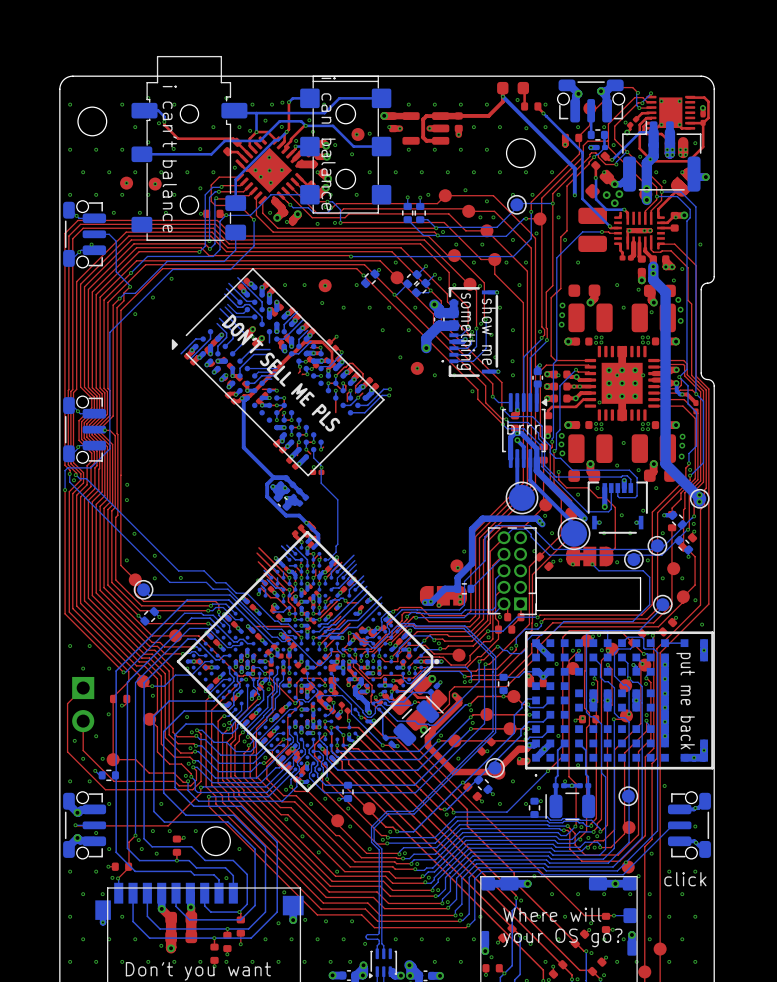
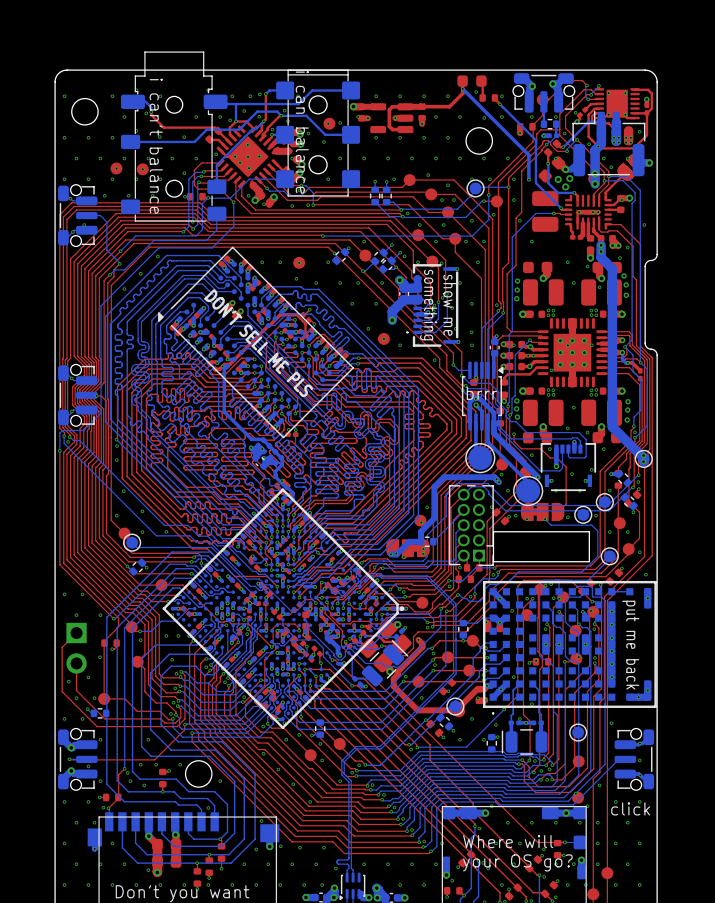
bottom track: none -> (218, 255) (166, 255) (105, 316) (105, 421) (222, 538) (240, 538)
bottom track: none -> (210, 260) (169, 260) (167, 266) (161, 267) (161, 273) (155, 274) (154, 280) (148, 281) (147, 286) (140, 288) (139, 294) (134, 294) (134, 300) (128, 301) (125, 308) (120, 309) (120, 313) (110, 324) (110, 419) (220, 529) (242, 529) (245, 533)
bottom track: none -> (208, 265) (176, 265) (117, 324) (122, 332) (115, 334) (115, 339) (121, 340) (122, 343) (115, 345) (115, 349) (121, 351) (122, 354) (115, 356) (115, 361) (121, 362) (122, 365) (115, 367) (115, 372) (121, 373) (122, 376) (115, 378) (115, 383) (122, 386) (121, 389) (115, 390) (117, 396) (117, 419) (222, 524) (243, 524)
bottom track: none -> (206, 270) (178, 270) (127, 321) (127, 333)
bottom track: (227, 304) (237, 313) -> (255, 525) (240, 510) (237, 510) (236, 514) (233, 514) (232, 510) (229, 510) (147, 428) (147, 419) (138, 410) (137, 406) (131, 401) (132, 396) (138, 393) (137, 390) (132, 387) (132, 381) (145, 378) (144, 375) (134, 375) (131, 371) (133, 365) (145, 363) (145, 360) (140, 359) (138, 356) (139, 351) (145, 349) (145, 346) (138, 342) (138, 320) (183, 275) (205, 275) (218, 288)
bottom track: (225, 307) (235, 316) -> (260, 526) (241, 506) (230, 506) (150, 426) (150, 418) (141, 409) (140, 403) (135, 401) (141, 393) (140, 388) (135, 386) (135, 383) (145, 382) (149, 378) (146, 372) (135, 370) (135, 367) (145, 367) (149, 363) (147, 358) (141, 355) (141, 353) (148, 350) (149, 346) (147, 342) (141, 340) (141, 322) (184, 278) (204, 278) (217, 291)
bottom track: none -> (202, 284) (187, 284) (151, 320) (151, 389) (147, 392) (151, 397) (147, 404) (154, 406) (151, 413)
bottom track: none -> (273, 286) (301, 286) (303, 289) (318, 289) (418, 388) (418, 517) (380, 554) (351, 554)
bottom track: none -> (201, 292) (187, 292) (155, 324) (157, 401) (163, 407) (167, 405) (169, 407) (163, 417) (165, 418) (173, 412) (175, 419) (180, 417) (182, 419) (181, 425) (187, 424) (186, 430) (197, 441) (197, 447) (202, 445) (205, 447) (200, 455) (203, 457) (211, 452) (212, 455) (207, 461) (210, 464) (218, 459) (219, 462) (214, 468) (217, 470) (223, 465) (226, 468) (220, 476) (223, 478) (231, 472) (232, 475) (227, 482) (230, 484) (238, 479) (239, 482) (234, 489) (247, 496) (261, 510)
bottom track: none -> (278, 294) (291, 294) (296, 290) (298, 297) (305, 294) (308, 300) (310, 299) (311, 294) (316, 294) (413, 390) (413, 515) (379, 549) (351, 549)
bottom track: none -> (199, 297) (188, 297) (160, 325) (162, 366) (173, 369) (172, 371) (162, 372) (163, 376) (171, 376) (173, 378) (162, 381) (162, 392) (167, 397) (173, 395) (174, 398) (172, 402) (174, 404) (183, 399) (185, 402) (179, 409) (182, 411) (188, 406) (191, 406) (192, 409) (186, 416) (188, 419) (196, 413) (199, 414) (199, 417) (194, 423) (195, 426) (203, 421) (206, 422) (206, 425) (198, 434) (205, 435) (246, 476) (246, 483) (252, 483) (249, 490) (250, 492) (259, 489) (259, 502)
bottom track: none -> (283, 304) (287, 304) (292, 309) (295, 308) (297, 302) (302, 306) (316, 306)
bottom track: none -> (317, 306) (318, 313) (324, 309) (326, 311) (323, 317) (324, 319) (330, 316) (333, 317) (329, 324) (330, 327) (335, 325) (339, 328) (344, 328) (408, 393) (408, 512) (377, 544) (339, 544)
bottom track: none -> (286, 314) (311, 314) (332, 336) (340, 332) (341, 335) (330, 346) (331, 349) (347, 337) (348, 340) (338, 351) (338, 353) (340, 354) (345, 350) (349, 353) (362, 353) (404, 395) (404, 510) (374, 539) (337, 539)
bottom track: none -> (247, 315) (316, 384) (336, 384) (344, 376) (350, 376) (352, 387) (355, 388) (357, 371) (360, 370) (361, 388) (365, 389) (366, 370) (369, 369) (371, 387) (375, 387) (376, 377) (378, 376) (399, 397) (399, 508) (372, 534) (334, 534)
top track: none -> (285, 319) (266, 339) (266, 367) (297, 398) (297, 404) (290, 411) (290, 419) (313, 420) (323, 430) (325, 438) (354, 438) (356, 440) (355, 443) (311, 443) (312, 447) (323, 449) (322, 452) (311, 452) (310, 456) (325, 457) (326, 461) (311, 462) (310, 465) (312, 467) (323, 467) (323, 474) (317, 484) (307, 475) (304, 476) (311, 487) (292, 506) (292, 510)
bottom track: none -> (248, 321) (314, 388) (347, 388) (355, 395) (374, 396) (382, 389) (384, 393) (370, 407) (372, 410) (387, 396) (391, 398) (377, 415) (380, 417) (390, 407) (393, 409) (391, 413) (394, 417) (394, 506) (370, 529) (334, 529)
bottom track: none -> (166, 325) (166, 332) (171, 337) (164, 339) (164, 342) (166, 344) (166, 353) (170, 352) (172, 355) (170, 360) (179, 366) (179, 377) (188, 371) (191, 373) (176, 391) (180, 393) (192, 381) (195, 384) (187, 393) (188, 396) (190, 396) (199, 388) (202, 390) (193, 399) (195, 403) (208, 392) (211, 393) (200, 407) (202, 410) (209, 407) (211, 409) (211, 421) (218, 423) (217, 426) (211, 428) (211, 435) (217, 439) (224, 433) (226, 433) (227, 436) (221, 443) (223, 446) (231, 439) (234, 441) (227, 451) (230, 453) (236, 448) (239, 449) (234, 458) (263, 487) (263, 501)
bottom track: none -> (247, 326) (319, 401) (322, 400) (322, 393) (326, 393) (327, 409) (331, 408) (331, 394) (333, 393) (336, 394) (336, 408) (340, 409) (341, 394) (345, 393) (346, 400) (355, 401) (389, 435) (389, 504) (368, 524) (327, 524)
bottom track: none -> (174, 330) (174, 338) (177, 341) (171, 347) (173, 350) (186, 339) (189, 341) (176, 355) (177, 357) (192, 345) (195, 347) (183, 361) (183, 364) (186, 364) (199, 351) (201, 354) (191, 364) (192, 367) (194, 367) (204, 358) (207, 359) (195, 373) (196, 375) (199, 376) (210, 364) (213, 366) (209, 372) (218, 381) (218, 416) (244, 442) (244, 457) (265, 478) (268, 478)
bottom track: none -> (127, 333) (133, 337) (127, 341) (133, 345) (127, 350) (127, 414) (131, 419) (130, 424) (133, 425) (140, 421) (141, 423) (137, 431) (143, 431) (147, 435) (147, 439) (227, 518) (242, 518) (255, 531)
bottom track: none -> (255, 339) (282, 366) (282, 370) (330, 418) (336, 420) (338, 425) (342, 425) (343, 412) (349, 411) (353, 418) (362, 418) (364, 421) (364, 425) (357, 432) (359, 434) (370, 428) (377, 435) (384, 439) (382, 446) (368, 448) (369, 451) (380, 451) (384, 455) (381, 461) (368, 463) (369, 466) (380, 466) (384, 470) (382, 476) (370, 478) (370, 481) (380, 481) (384, 485) (383, 491) (377, 493) (376, 506) (364, 519) (327, 519)
bottom track: none -> (253, 342) (278, 367) (278, 371) (329, 422) (334, 422) (336, 428) (344, 427) (345, 415) (348, 414) (351, 421) (361, 422) (354, 431) (357, 437) (361, 438) (369, 431) (375, 438) (381, 440) (380, 443) (369, 443) (365, 447) (368, 454) (381, 455) (380, 458) (369, 458) (365, 462) (368, 469) (381, 470) (380, 473) (370, 474) (366, 477) (368, 484) (381, 485) (380, 488) (373, 492) (373, 505) (368, 510) (362, 510) (363, 515) (326, 515)
top track: none -> (274, 343) (274, 365) (313, 404) (331, 404) (356, 427) (362, 426) (364, 415) (367, 415) (368, 428) (371, 432) (377, 430) (380, 422) (388, 422) (395, 428) (395, 440) (387, 436) (381, 441) (382, 444) (389, 453) (386, 455) (377, 447) (372, 449) (370, 454) (375, 460) (369, 466) (369, 476) (363, 472) (358, 473) (356, 478) (360, 485) (358, 487) (351, 482) (347, 485) (345, 489) (350, 495) (346, 500) (314, 500) (290, 524)
top track: none -> (277, 344) (277, 364) (315, 401) (332, 401) (356, 424) (360, 423) (362, 413) (368, 412) (371, 415) (372, 428) (375, 428) (376, 421) (379, 419) (390, 419) (398, 427) (398, 442) (394, 444) (387, 440) (384, 442) (392, 450) (392, 454) (386, 458) (377, 450) (374, 452) (378, 460) (373, 467) (373, 477) (369, 480) (362, 475) (360, 477) (363, 486) (358, 490) (351, 486) (349, 487) (353, 496) (347, 503) (315, 503) (293, 525)
bottom track: none -> (251, 345) (269, 363) (269, 368) (316, 415) (311, 425) (314, 426) (322, 420) (328, 427) (322, 436) (325, 437) (331, 431) (333, 431) (334, 434) (328, 441) (331, 444) (341, 436) (343, 439) (335, 449) (338, 451) (346, 445) (354, 452) (354, 459) (359, 460) (358, 464) (345, 464) (345, 468) (357, 468) (358, 471) (345, 473) (344, 475) (360, 477) (361, 480) (346, 481) (344, 484) (360, 486) (361, 489) (346, 490) (344, 493) (362, 494) (363, 498) (354, 499) (354, 507) (351, 510) (325, 510)
top track: none -> (295, 345) (293, 347) (285, 347) (284, 351) (297, 352) (297, 356) (284, 357) (283, 361) (305, 362) (304, 366) (295, 367) (295, 372) (317, 395) (333, 395) (345, 406) (408, 406) (413, 412) (404, 416) (406, 418) (413, 420) (413, 423) (406, 424) (404, 426) (413, 429) (413, 440) (385, 468) (385, 477) (349, 513) (318, 513) (314, 517)
bottom track: none -> (250, 348) (265, 364) (265, 370) (300, 404) (300, 416) (307, 423) (307, 432) (300, 442) (303, 444) (314, 434) (316, 438) (307, 449) (310, 450) (318, 443) (323, 447) (323, 453) (315, 454) (315, 458) (338, 459) (337, 462) (316, 463) (317, 467) (336, 467) (338, 469) (336, 471) (316, 472) (317, 476) (336, 476) (338, 477) (336, 480) (317, 480) (316, 484) (336, 484) (338, 487) (336, 489) (317, 489) (316, 492) (336, 493) (338, 496) (324, 498) (323, 506) (312, 517)
top track: none -> (313, 357) (313, 376) (321, 385) (337, 385) (349, 397) (387, 397) (393, 391) (396, 396) (399, 396) (400, 392) (403, 391) (405, 396) (408, 397) (410, 391) (414, 391) (418, 395) (416, 401) (424, 401) (423, 408) (431, 407) (432, 410) (430, 415) (432, 416) (437, 414) (446, 423) (446, 429) (353, 523) (322, 523) (303, 541) (303, 549)
top track: none -> (241, 358) (225, 373) (219, 374) (213, 374) (197, 359) (192, 359)
top track: none -> (358, 358) (422, 358) (475, 411) (475, 442) (346, 571)
top track: none -> (191, 359) (188, 352) (186, 353) (184, 359) (181, 358) (179, 352) (177, 353) (176, 358) (173, 359) (172, 353) (170, 352) (167, 359) (144, 359) (117, 386) (116, 439)
top track: none -> (318, 359) (316, 373) (323, 380) (339, 380) (349, 390) (355, 390) (360, 386) (362, 391) (365, 392) (367, 387) (370, 386) (372, 391) (375, 392) (377, 387) (379, 386) (381, 391) (384, 392) (387, 386) (416, 386) (451, 421) (451, 431) (355, 528) (324, 528) (308, 543) (308, 550)
top track: none -> (327, 361) (324, 367) (327, 370) (343, 370) (349, 376) (420, 376) (461, 417) (461, 435) (350, 546) (337, 546) (329, 554)
top track: none -> (333, 361) (344, 364) (348, 368) (357, 368) (359, 370)
top track: none -> (358, 363) (372, 363) (373, 364)
top track: none -> (378, 364) (379, 363) (420, 363) (471, 413) (471, 440) (343, 568) (317, 570)
top track: none -> (378, 364) (376, 366) (373, 364)
top track: none -> (319, 369) (325, 375) (341, 375) (351, 385) (355, 381) (418, 381) (456, 419) (456, 433) (357, 532) (344, 532) (348, 540) (346, 542) (332, 532) (330, 535) (335, 541) (327, 550) (316, 548) (311, 552)
top track: none -> (364, 370) (367, 368) (370, 371) (393, 371) (397, 367) (418, 367) (466, 415) (466, 437) (341, 563) (337, 563) (333, 567) (313, 567)
top track: none -> (364, 370) (362, 372) (359, 370)
top track: none -> (247, 372) (241, 378) (209, 378) (195, 364) (146, 364) (122, 388) (122, 478) (192, 548) (207, 548) (235, 576)
top track: none -> (256, 379) (251, 379) (248, 382) (207, 382) (193, 369) (148, 369) (127, 390) (127, 476) (191, 540) (197, 540) (199, 543) (207, 540) (209, 543) (214, 540) (221, 543) (226, 540) (230, 546) (232, 545) (233, 541) (240, 540)
top track: none -> (308, 379) (319, 390) (335, 390) (347, 402) (410, 402) (423, 415) (419, 423) (430, 425) (429, 428) (419, 428) (418, 431) (429, 432) (430, 435) (419, 437) (419, 440) (423, 442) (423, 446) (418, 450) (412, 448) (411, 450) (414, 455) (412, 456) (406, 454) (405, 456) (408, 460) (406, 462) (402, 460) (399, 461) (401, 467) (351, 518) (320, 518) (298, 539) (298, 548) (295, 552)
bottom track: none -> (239, 381) (232, 388) (234, 399) (230, 405) (232, 406) (244, 397) (246, 400) (236, 409) (236, 412) (239, 413) (251, 403) (252, 406) (242, 416) (242, 418) (245, 419) (256, 409) (257, 412) (248, 422) (248, 424) (251, 425) (263, 415) (264, 418) (254, 428) (254, 430) (257, 431) (266, 424) (268, 426) (264, 431) (266, 433) (272, 430) (274, 433) (272, 436) (275, 438) (282, 434) (283, 436) (277, 445) (279, 446) (287, 440) (289, 443) (283, 451) (285, 452) (292, 446) (295, 448) (287, 458) (288, 460) (298, 453) (301, 454) (291, 466) (294, 469) (299, 464) (303, 467) (302, 473) (295, 474) (294, 476) (305, 478) (305, 481) (295, 482) (294, 485) (305, 487) (306, 490) (303, 492) (303, 500) (293, 509)
top track: none -> (259, 382) (252, 382) (249, 386) (205, 387) (191, 373) (150, 373) (131, 392) (131, 474) (187, 529) (196, 528) (198, 534) (201, 534) (203, 527) (206, 528) (208, 535) (211, 534) (212, 527) (215, 528) (216, 534) (219, 535) (221, 528) (224, 527) (226, 534) (228, 535) (231, 527) (242, 527)
top track: none -> (254, 386) (251, 389) (203, 391) (190, 378) (152, 378) (136, 394) (136, 472) (181, 516) (184, 514) (187, 514) (189, 522) (192, 521) (194, 514) (197, 514) (199, 522) (202, 521) (203, 514) (207, 514) (208, 522) (211, 521) (213, 514) (216, 514) (218, 522) (221, 521) (222, 514) (226, 514) (228, 522) (230, 522) (232, 517) (237, 516)
top track: none -> (260, 386) (253, 393) (201, 396) (188, 383) (154, 383) (141, 396) (141, 470) (180, 508) (185, 508) (187, 501) (190, 502) (192, 508) (195, 508) (197, 501) (200, 502) (200, 508) (204, 508) (205, 502) (208, 501) (211, 508) (236, 508)
top track: none -> (267, 393) (263, 397) (233, 397) (229, 401) (199, 401) (190, 394) (188, 401) (186, 402) (184, 389) (181, 388) (180, 401) (177, 402) (175, 389) (172, 388) (171, 401) (168, 402) (166, 389) (164, 388) (161, 402) (158, 401) (156, 394) (150, 394) (146, 398) (146, 468) (174, 496) (211, 496) (218, 504) (238, 504)
top track: none -> (268, 400) (266, 401) (236, 401) (232, 406) (209, 406) (204, 411) (192, 411) (190, 421) (187, 420) (186, 407) (183, 408) (181, 421) (179, 420) (177, 407) (174, 408) (173, 421) (170, 420) (169, 411) (163, 411) (158, 415) (153, 412) (151, 415) (159, 424) (157, 426) (151, 423) (151, 430) (160, 432) (162, 434) (151, 437) (151, 440) (159, 440) (160, 443) (152, 445) (151, 448) (161, 449) (162, 452) (152, 454) (151, 456) (161, 458) (162, 460) (152, 462) (151, 466) (176, 492) (213, 492) (220, 499) (245, 499) (271, 525)
top track: none -> (275, 400) (270, 405) (270, 411) (261, 420) (255, 420) (245, 411) (243, 418) (240, 419) (238, 407) (235, 408) (233, 419) (231, 418) (229, 411) (226, 412) (226, 418) (224, 419) (221, 411) (211, 411) (215, 418) (212, 420) (207, 416) (205, 417) (209, 424) (207, 426) (200, 422) (196, 426) (189, 426) (189, 433) (186, 434) (184, 427) (182, 426) (180, 433) (178, 434) (176, 427) (173, 426) (167, 432) (170, 437) (165, 439) (166, 442) (175, 444) (174, 446) (167, 448) (167, 468) (186, 487) (215, 487) (222, 494) (247, 494) (273, 522)
top track: none -> (282, 406) (277, 411) (277, 416) (284, 424) (284, 429) (273, 440) (264, 440)
top track: none -> (297, 411) (317, 411) (323, 416) (330, 411) (332, 414) (325, 423) (328, 424) (335, 417) (338, 419) (330, 430) (359, 432) (366, 438) (366, 445) (362, 450) (366, 456) (363, 458) (353, 448) (350, 449) (362, 463) (360, 467) (343, 452) (342, 455) (354, 470) (351, 471) (338, 458) (335, 460) (349, 477) (346, 478) (330, 464) (329, 467) (343, 481) (340, 484) (331, 475) (328, 476) (338, 490) (335, 491) (327, 485) (316, 495) (311, 495) (295, 512)
bottom track: none -> (151, 413) (158, 420) (157, 426) (160, 430) (163, 430) (170, 423) (175, 426) (175, 429) (168, 436) (171, 441) (174, 441) (181, 434) (185, 436) (186, 440) (180, 447) (180, 450) (184, 452) (190, 448) (195, 452) (191, 461) (195, 464) (201, 463) (204, 466) (202, 472) (205, 475) (210, 473) (214, 475) (213, 482) (215, 485) (222, 484) (225, 486) (224, 493) (226, 496) (234, 496) (249, 508) (254, 508) (262, 516)
top track: none -> (285, 417) (285, 421) (289, 425) (302, 425) (306, 429) (317, 429) (318, 432) (317, 434) (306, 434) (301, 441) (306, 449) (304, 452) (291, 441) (288, 442) (305, 461) (303, 465) (279, 442) (275, 443) (300, 470) (299, 474) (272, 449) (269, 453) (289, 473) (288, 476) (270, 461) (267, 464) (277, 474) (275, 478) (256, 460) (252, 461) (264, 475) (260, 481) (260, 487) (282, 509)
top track: none -> (273, 419) (279, 425) (279, 428) (273, 435) (259, 435) (252, 428) (214, 428) (209, 434) (207, 439) (185, 439) (185, 443) (215, 443) (217, 445) (215, 447) (185, 448) (185, 452) (215, 452) (217, 455) (215, 456) (185, 456) (184, 460) (215, 461) (217, 463) (215, 465) (185, 465) (184, 468) (185, 469) (216, 470) (216, 473) (209, 475) (210, 481) (217, 481) (222, 485) (242, 485) (249, 489) (276, 517)
bottom track: none -> (116, 439) (220, 543) (228, 543) (251, 563)
via: none -> (116, 439)
bottom track: (273, 477) (267, 484) (267, 496) (286, 515) (299, 515) (318, 535) -> (281, 457) (282, 464) (275, 471) (275, 476) (292, 493)
top track: none -> (264, 440) (256, 440) (250, 433) (246, 433) (243, 439) (222, 439) (223, 443) (243, 443) (245, 445) (243, 448) (222, 448) (222, 452) (249, 452) (251, 455) (249, 456) (222, 457) (223, 461) (246, 461) (247, 464) (223, 465) (222, 469) (252, 470) (253, 472) (252, 474) (223, 474) (221, 477) (244, 479) (247, 484) (251, 484) (282, 516)
bottom track: none -> (268, 478) (270, 485) (279, 487) (278, 490) (267, 490) (267, 494) (273, 496) (269, 501)
top track: none -> (346, 571) (344, 573) (322, 573)

